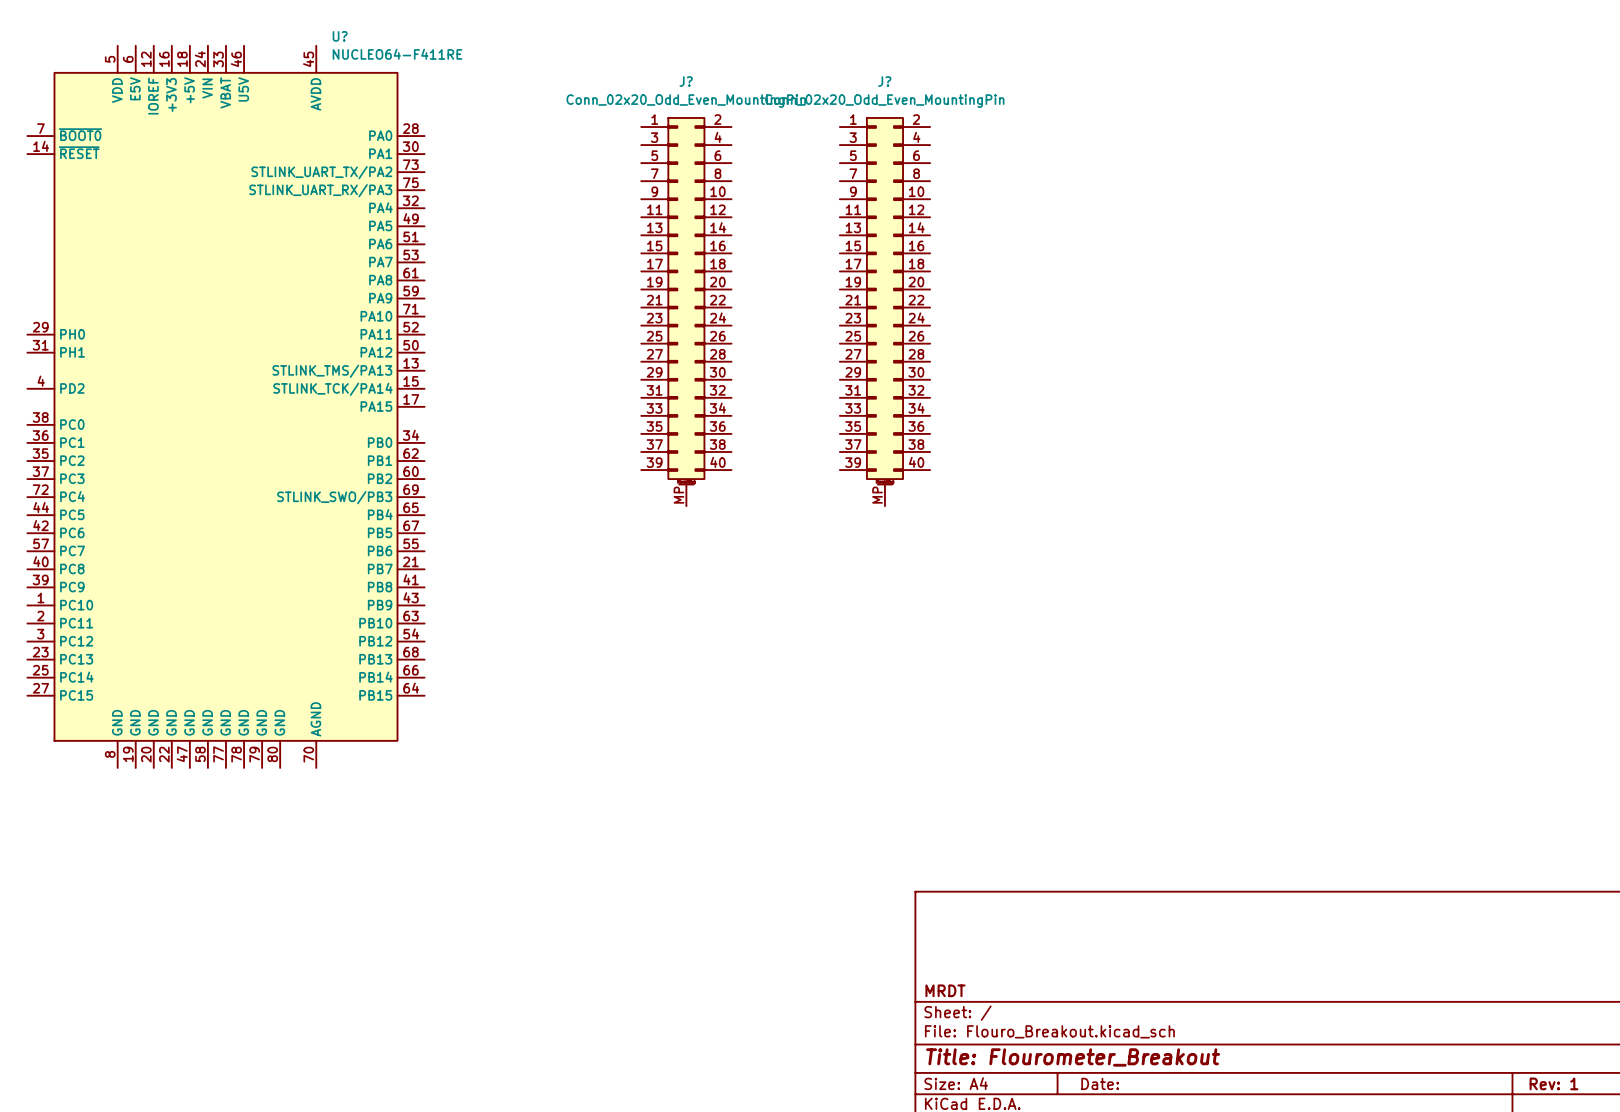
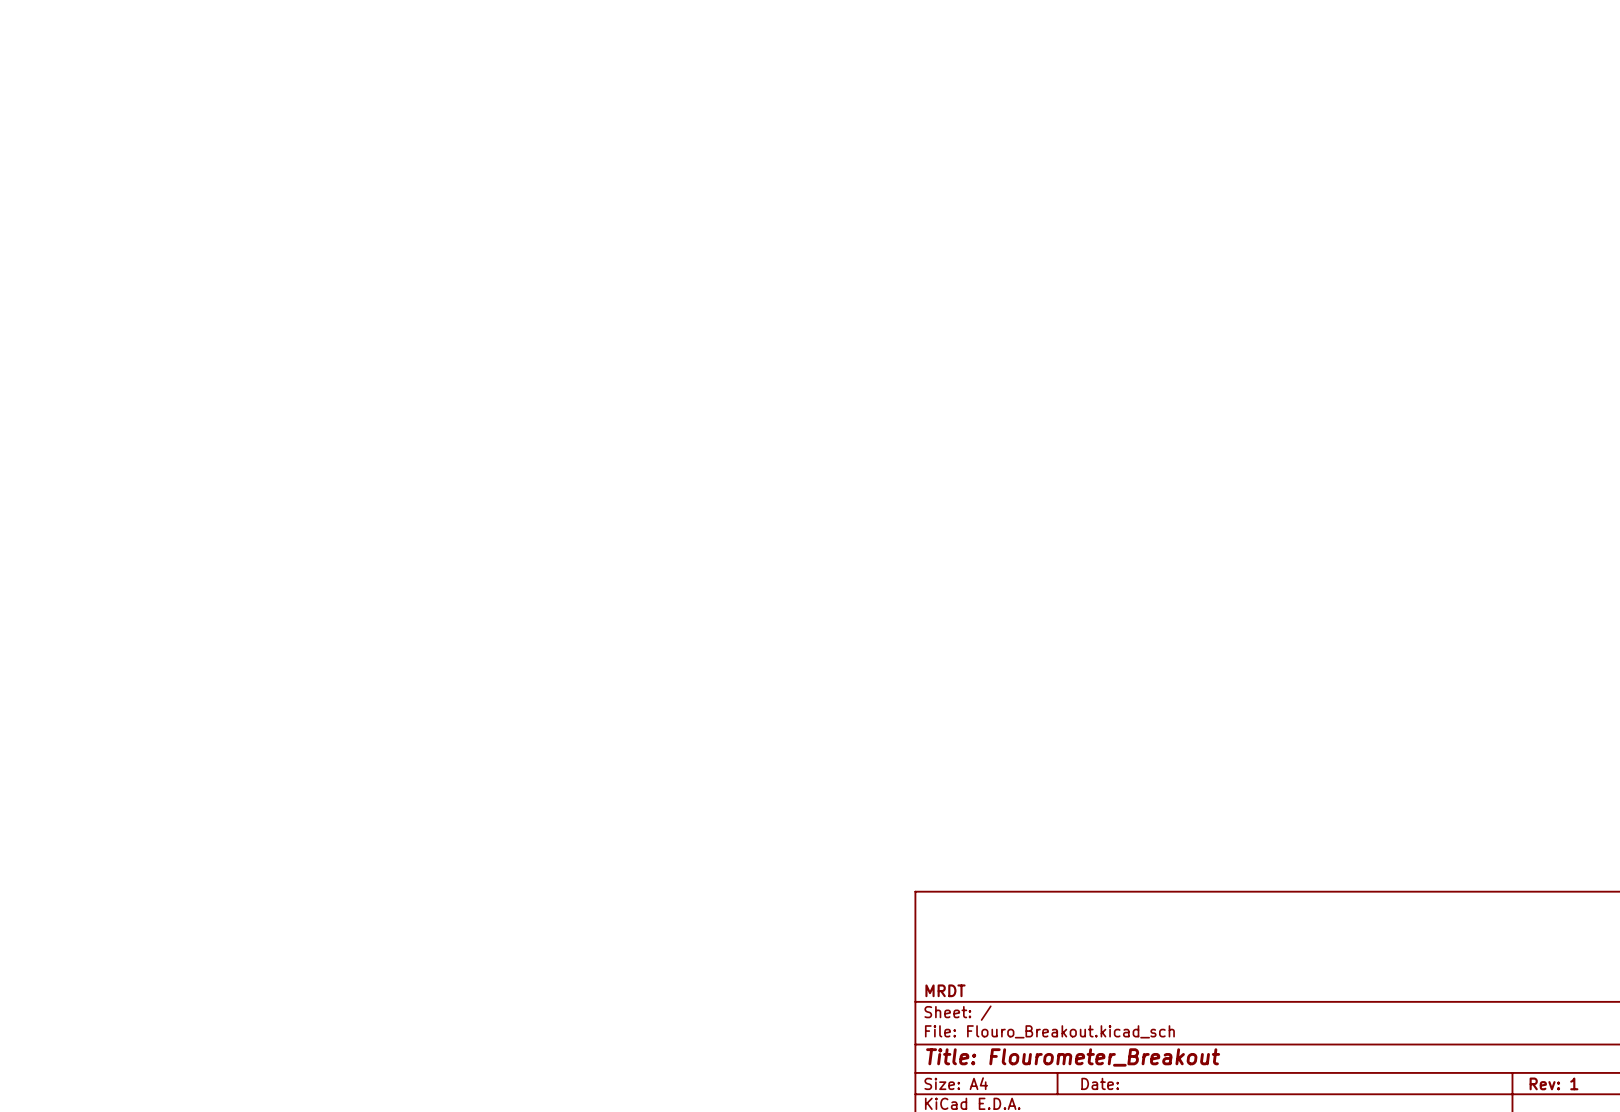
J?: Conn_02x20_Odd_Even_MountingPin (686, 311) -> none
J?: Conn_02x20_Odd_Even_MountingPin (884, 311) -> none
U?: NUCLEO64-F411RE (225, 406) -> none

